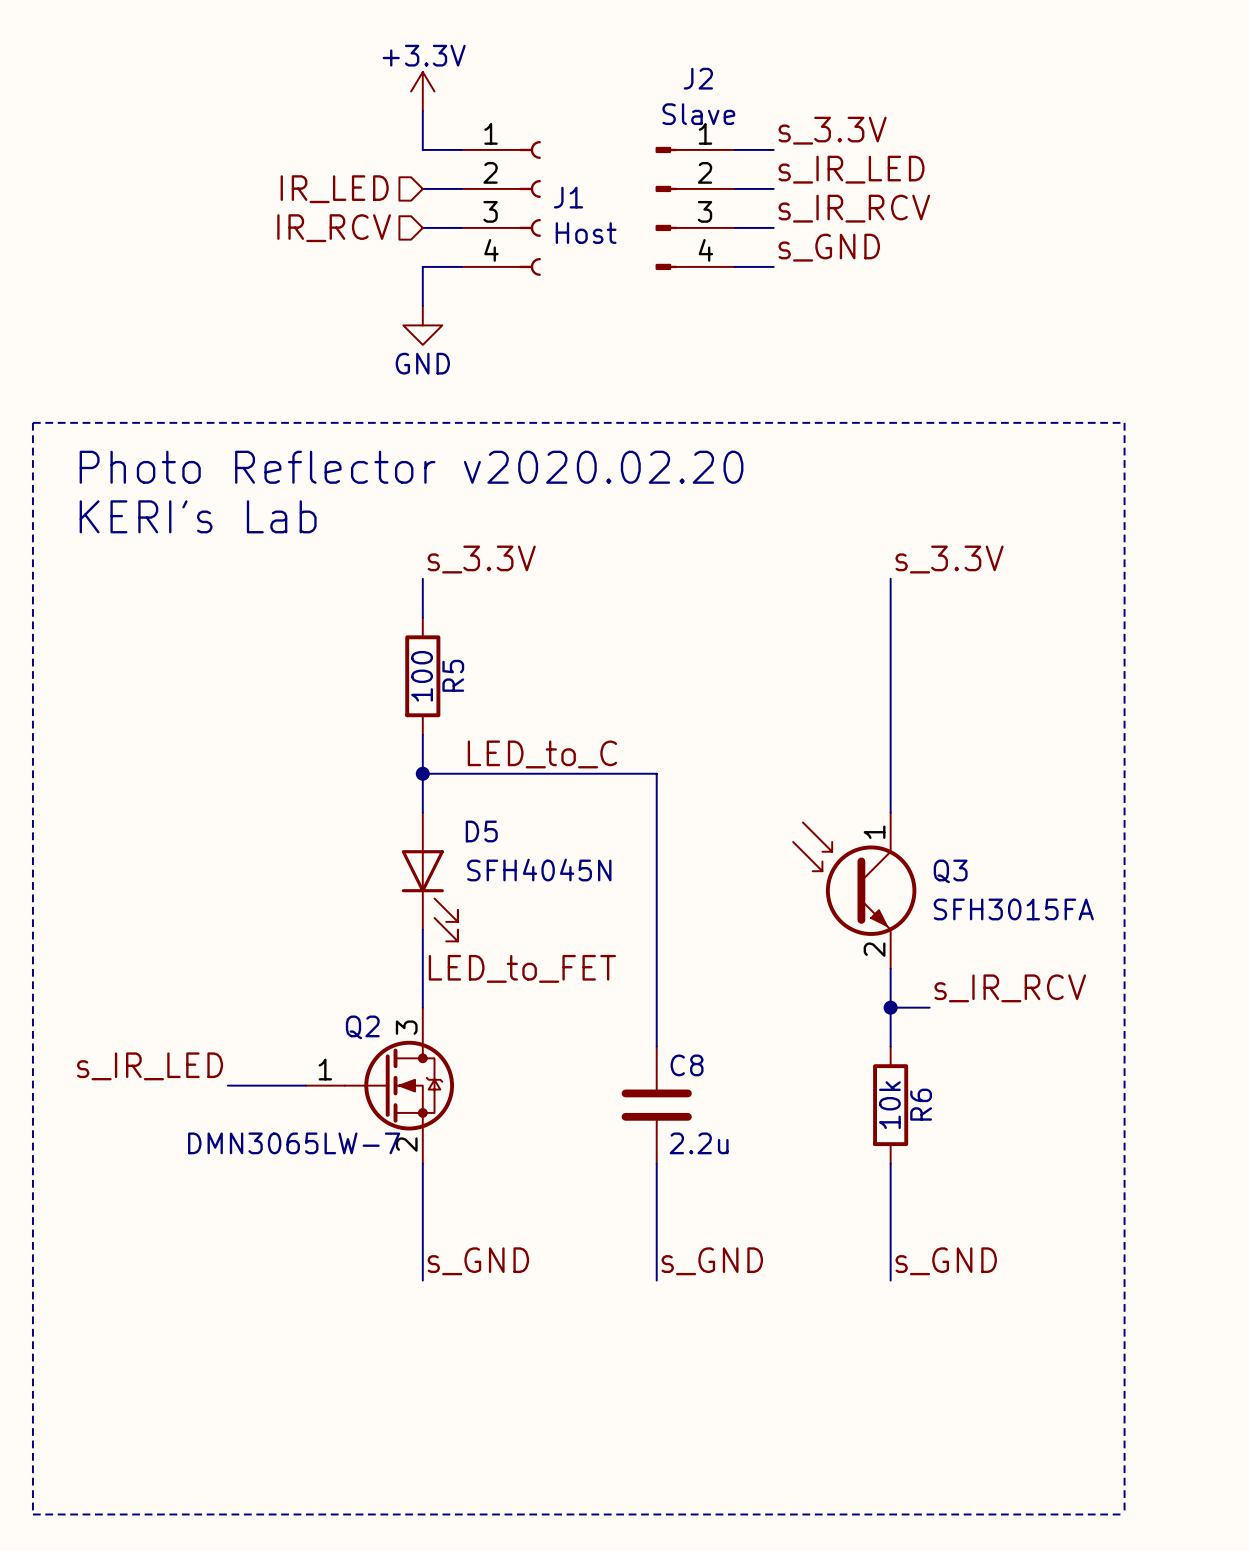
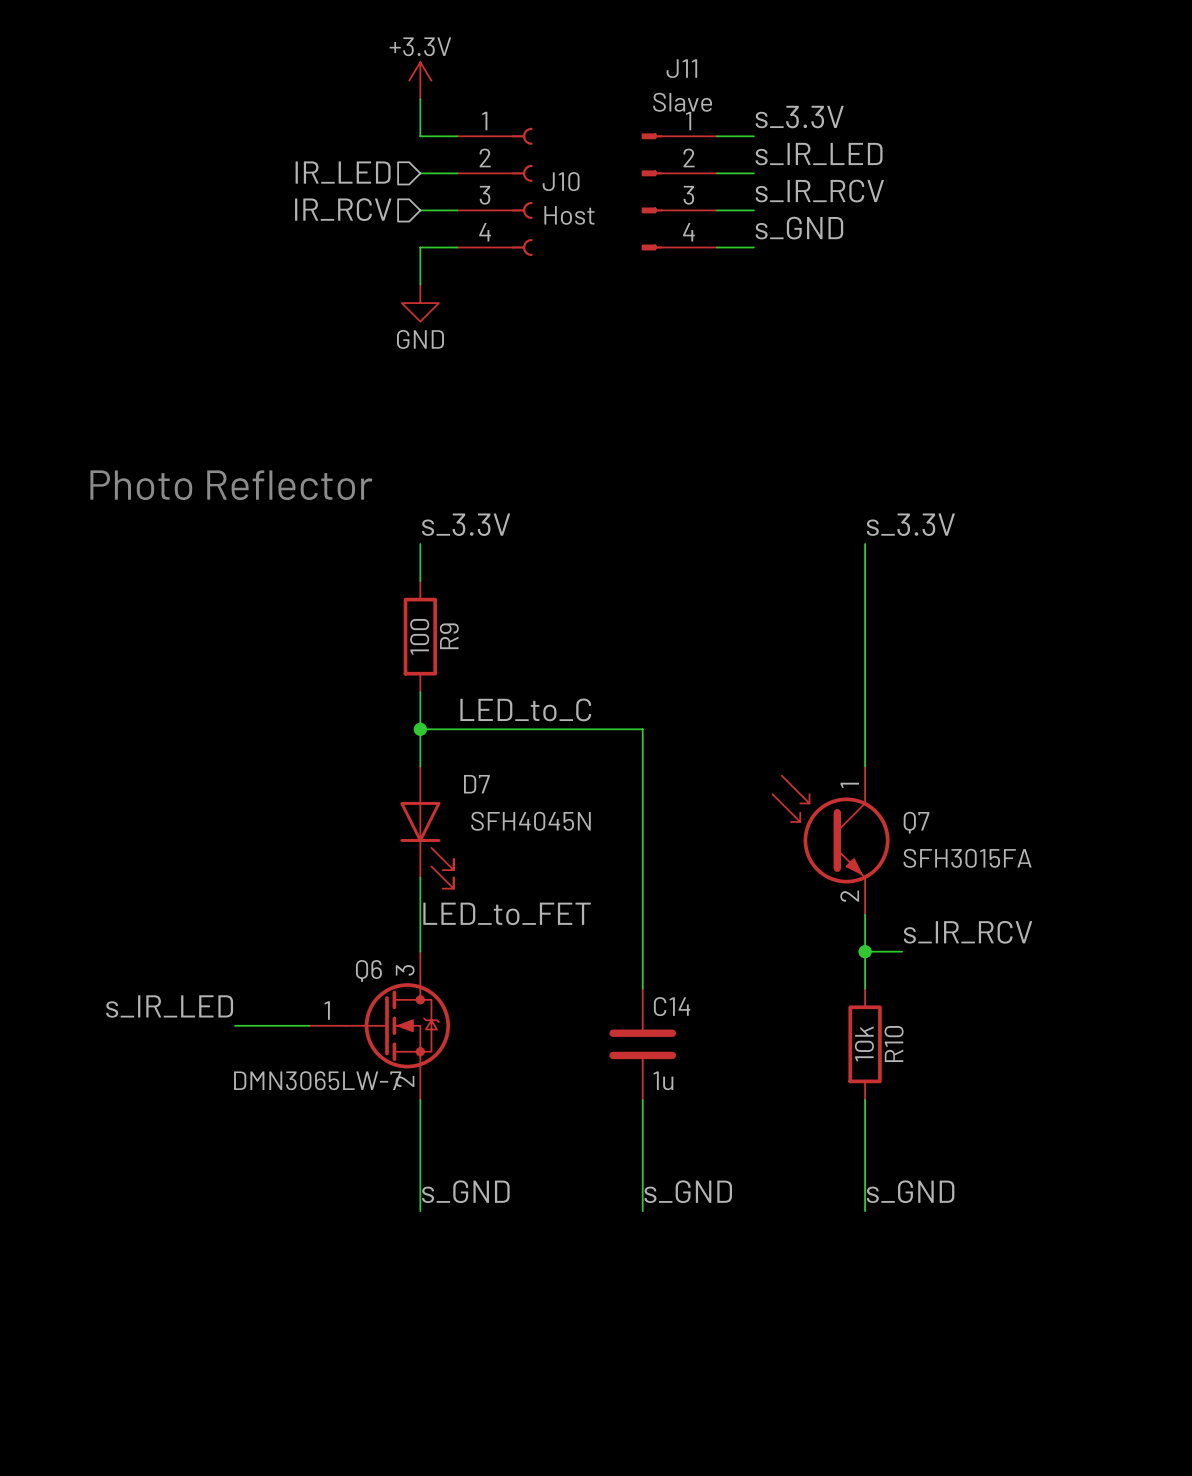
J2 name: J2 (698, 78) -> J11 (681, 68)
J1 name: J1 (568, 197) -> J10 (561, 181)
line: (32, 422) (32, 1514) (1124, 1514) (1124, 422) (32, 422) -> none
text: Photo Reflector v2020.02.20 (411, 467) -> none
text: KERI's Lab (198, 516) -> Photo Reflector (231, 485)
R5 name: R5 (453, 675) -> R9 (449, 636)
D5 name: D5 (481, 831) -> D7 (476, 784)
Q3 name: Q3 (950, 871) -> Q7 (916, 822)
Q2 name: Q2 (362, 1027) -> Q6 (368, 970)
C8 name: C8 (687, 1065) -> C14 (672, 1006)
R6 name: R6 (921, 1104) -> R10 (894, 1044)
C8 value: 2.2u (699, 1143) -> 1u (663, 1080)

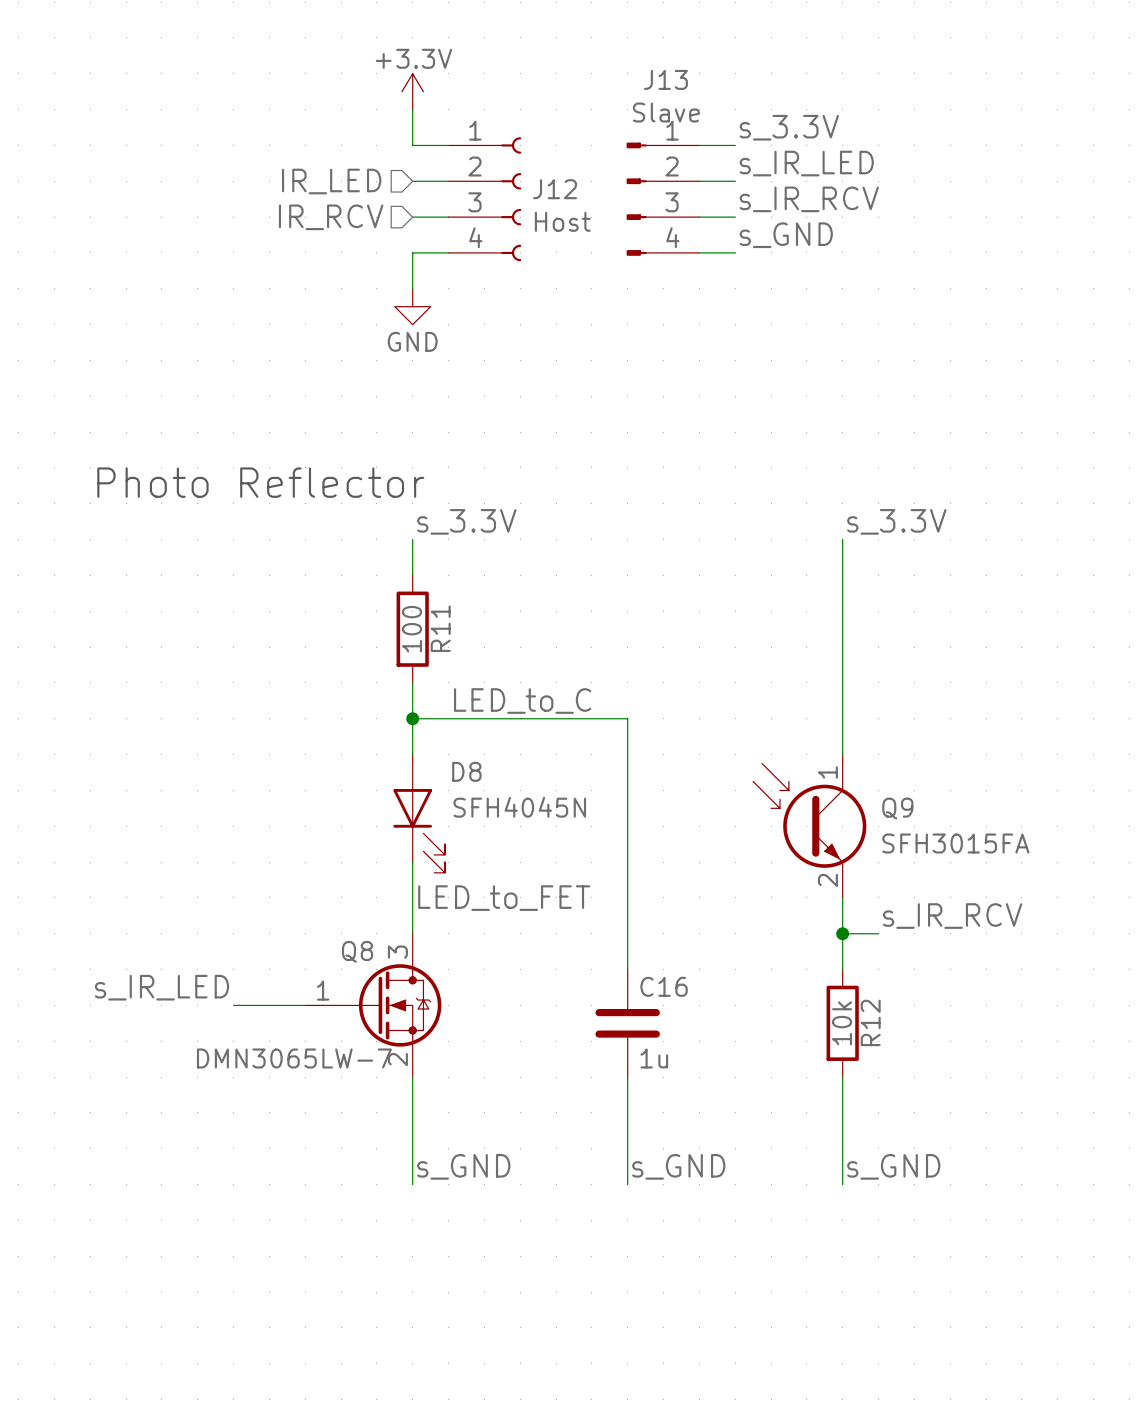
J11 name: J11 (681, 68) -> J13 (665, 79)
J10 name: J10 (561, 181) -> J12 (555, 189)
R9 name: R9 (449, 636) -> R11 (440, 628)
D7 name: D7 (476, 784) -> D8 (466, 771)
Q7 name: Q7 (916, 822) -> Q9 (897, 808)
Q6 name: Q6 (368, 970) -> Q8 (357, 951)
C14 name: C14 (672, 1006) -> C16 (664, 986)
R10 name: R10 (894, 1044) -> R12 (870, 1022)

